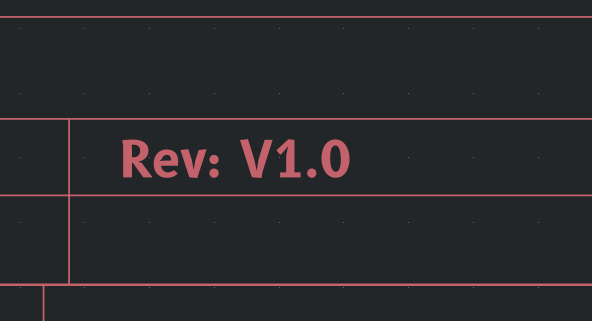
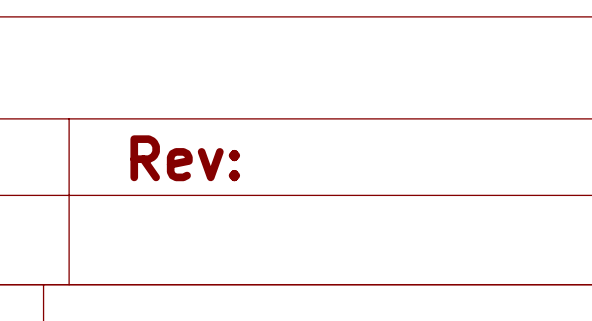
title block: Rev: V1.0 (235, 158) -> Rev: (185, 158)

